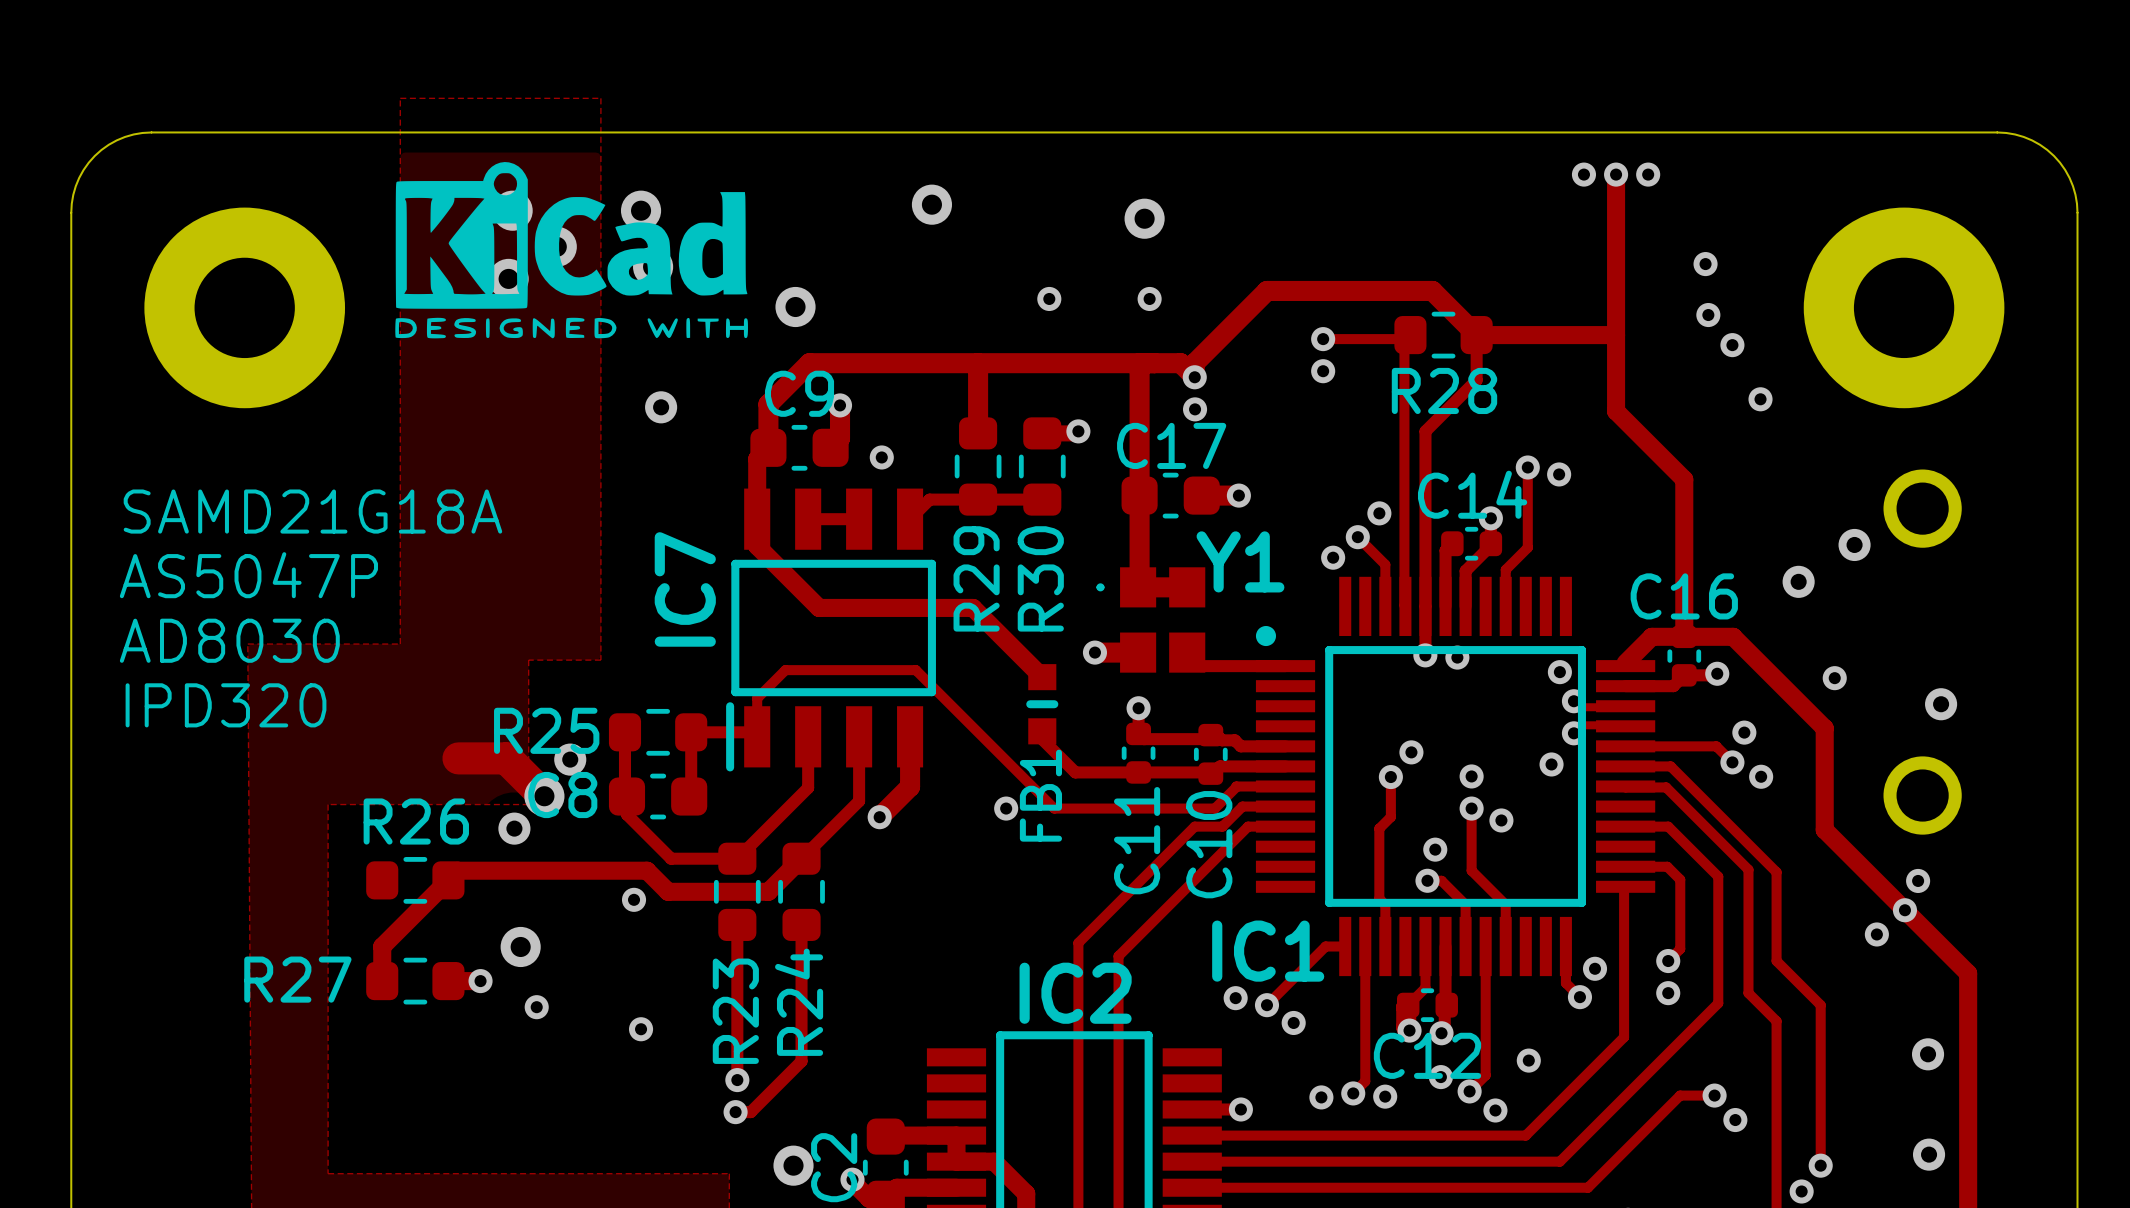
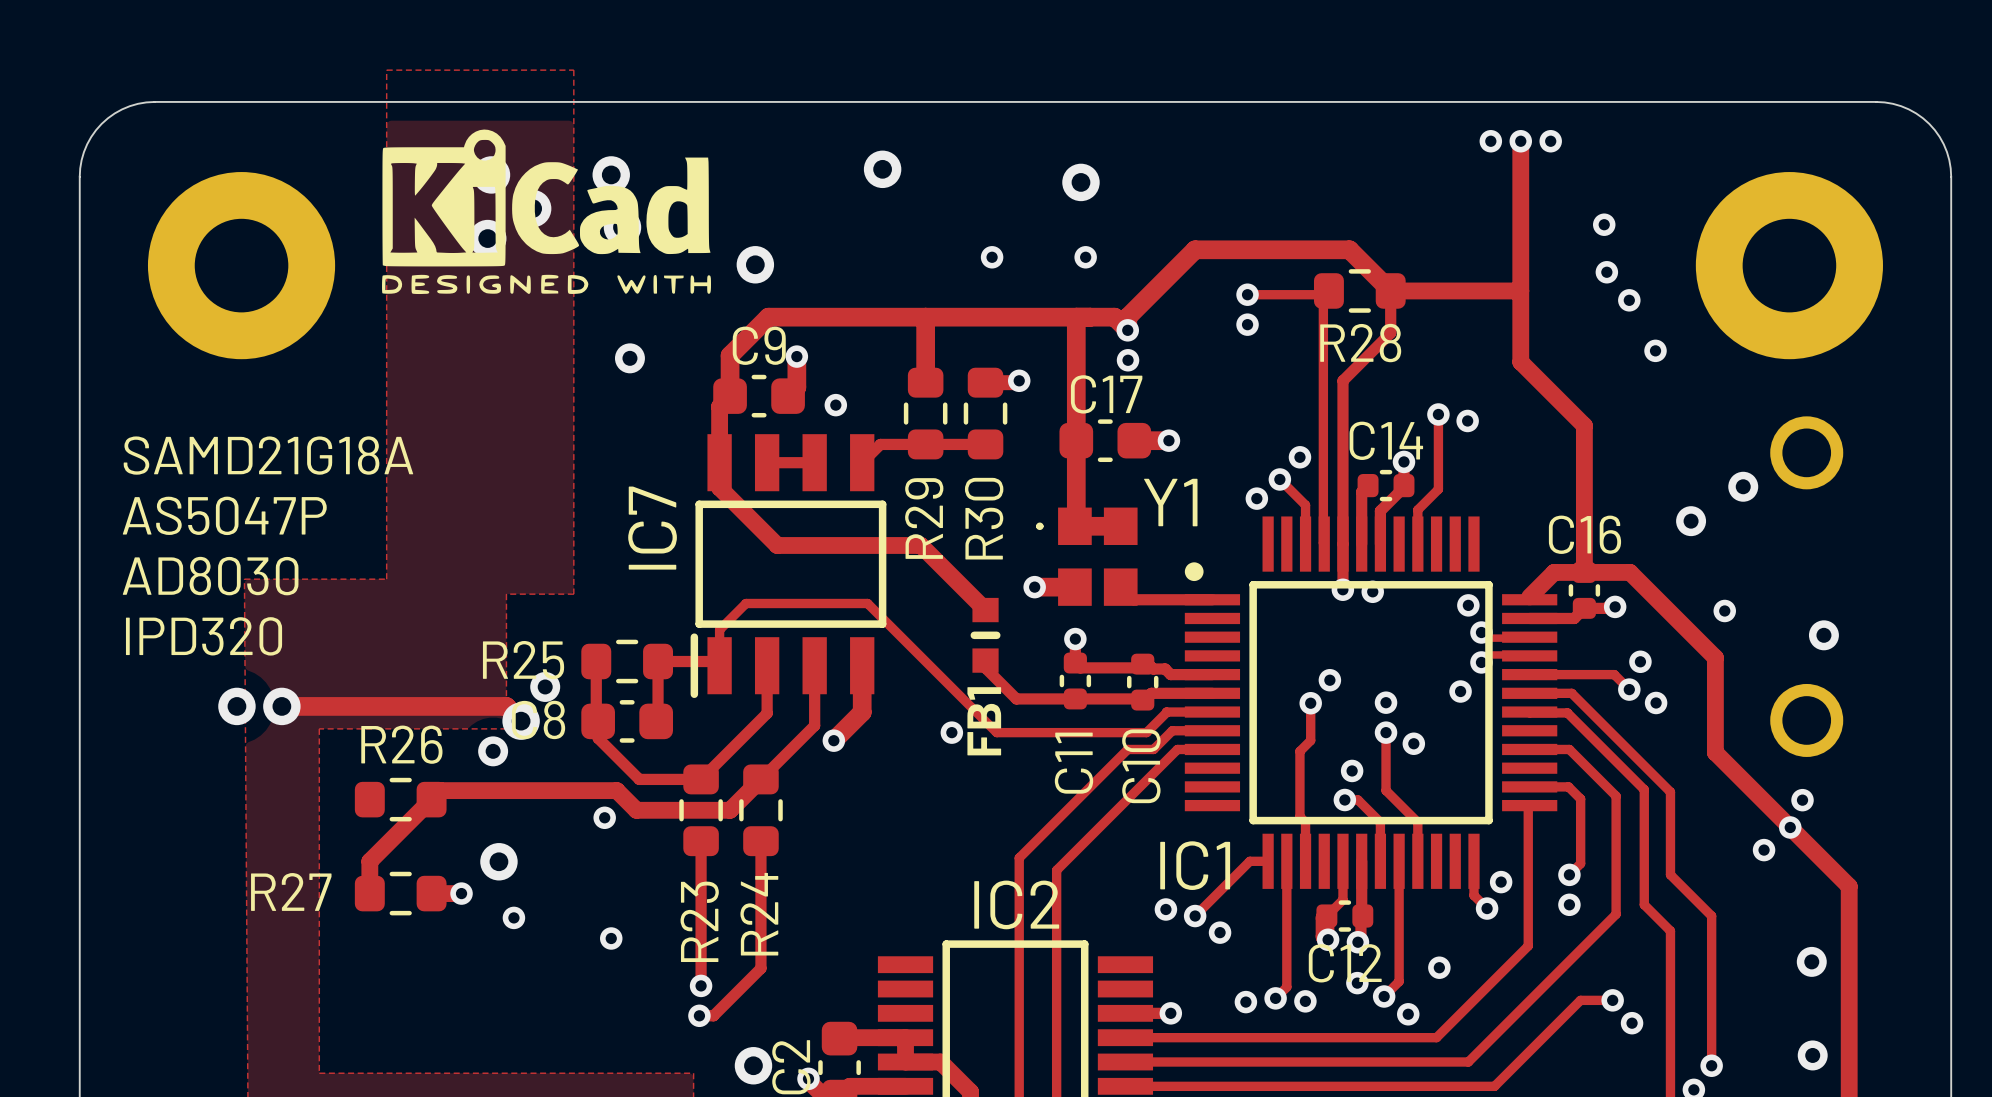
track: (458, 758) (506, 758) (528, 780) -> (281, 706) (506, 706)
via: none -> (236, 706)
via: none -> (281, 706)

